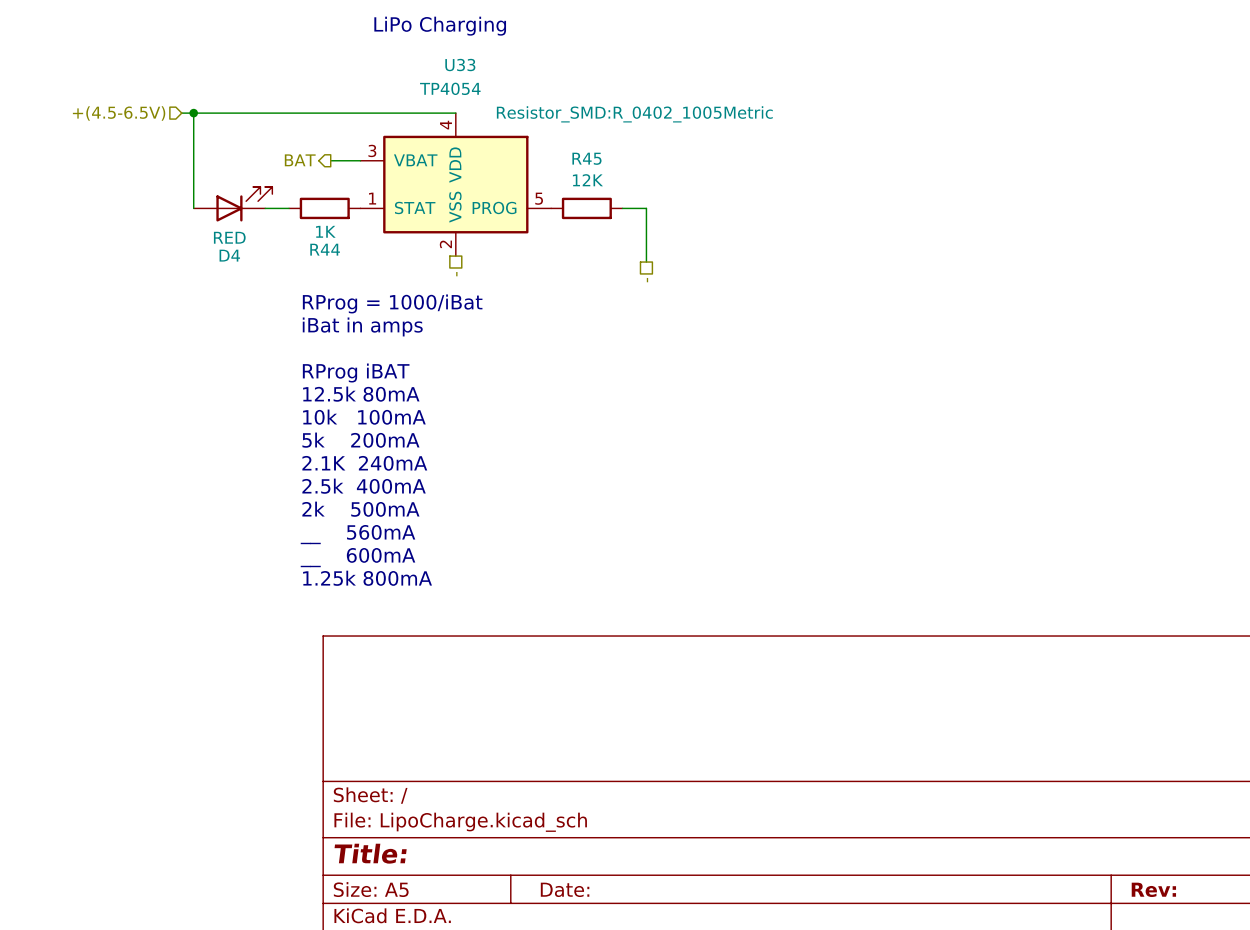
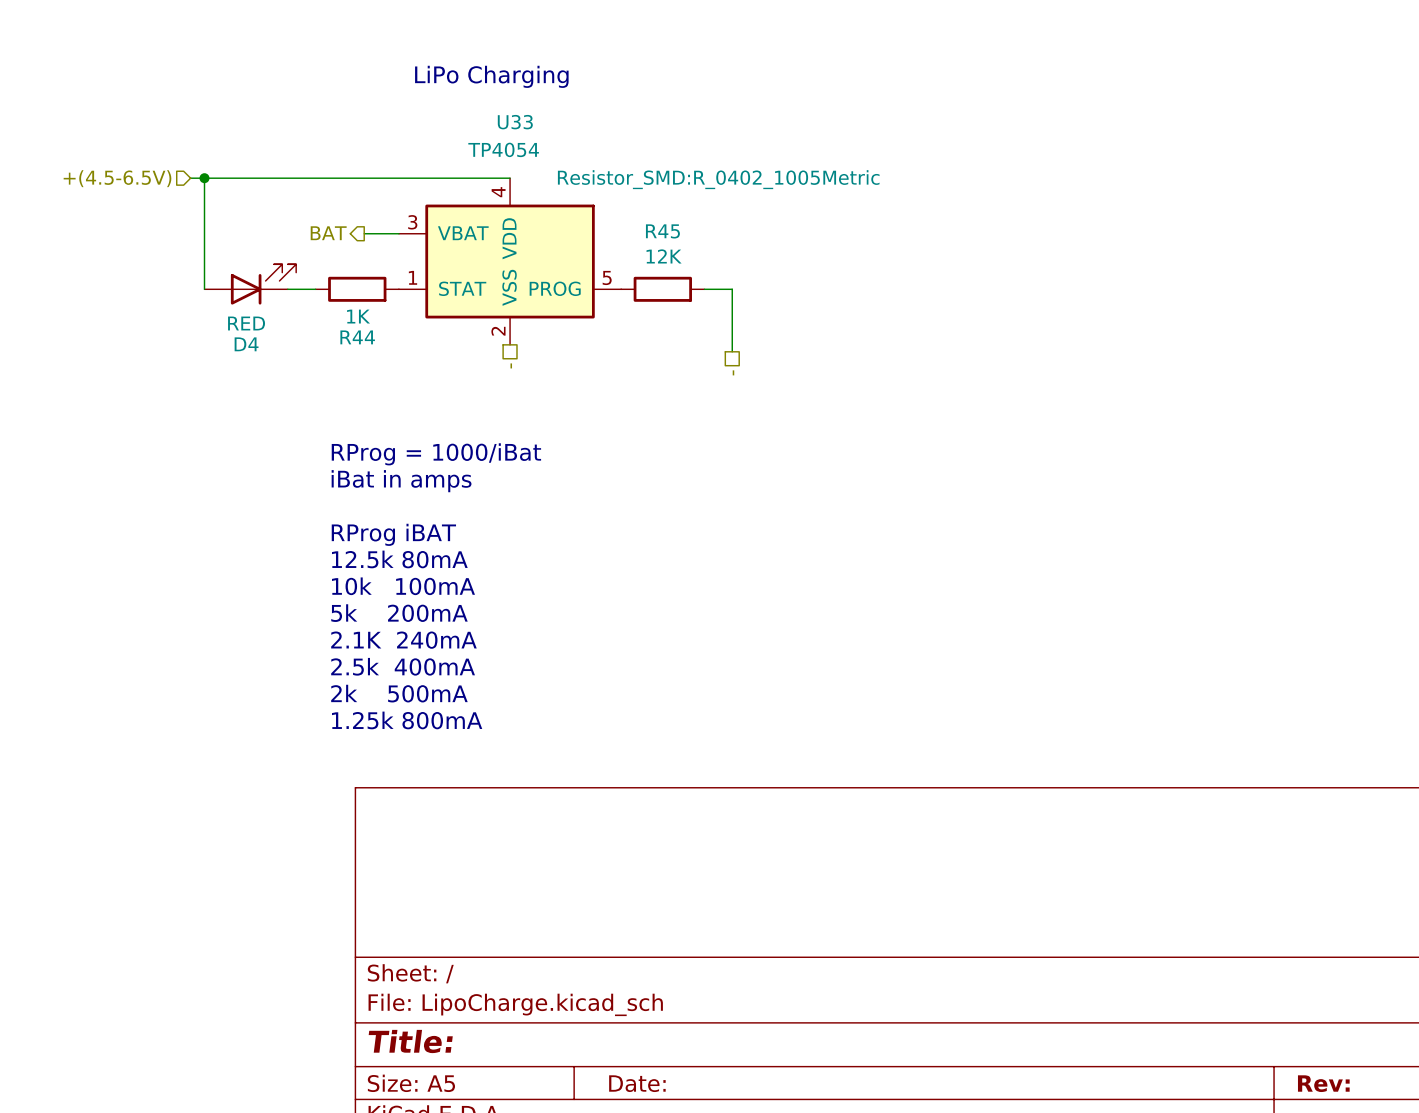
text position: RProg = 1000/iBat (392, 303) -> RProg = 1000/iBat (436, 454)
text: iBat in amps (362, 326) -> none
text: RProg iBAT (356, 373) -> iBat in amps (401, 481)
text: 12.5k 80mA (361, 394) -> none
text: 10k 100mA (364, 417) -> RProg iBAT (393, 534)
text: 5k 200mA (360, 440) -> 12.5k 80mA (399, 559)
text: 2.1K 240mA (364, 463) -> 10k 100mA (403, 586)
text: 2.5k 400mA (364, 486) -> 5k 200mA (399, 613)
text: 2k 500mA (360, 509) -> 2.1K 240mA (403, 640)
text: __ 560mA (358, 534) -> 2.5k 400mA (403, 666)
text: __ 600mA (358, 557) -> 2k 500mA (399, 693)

